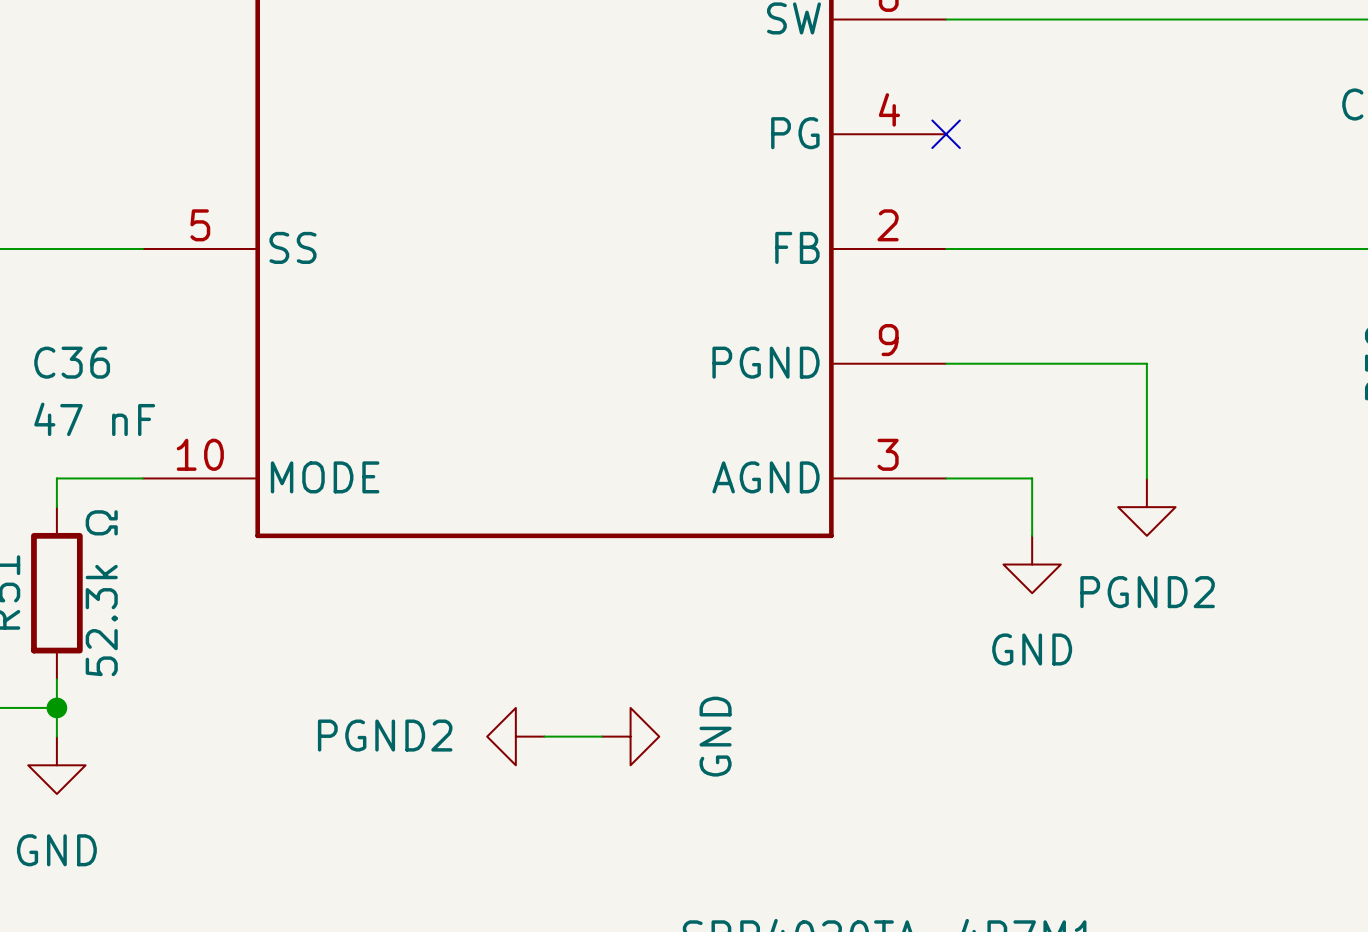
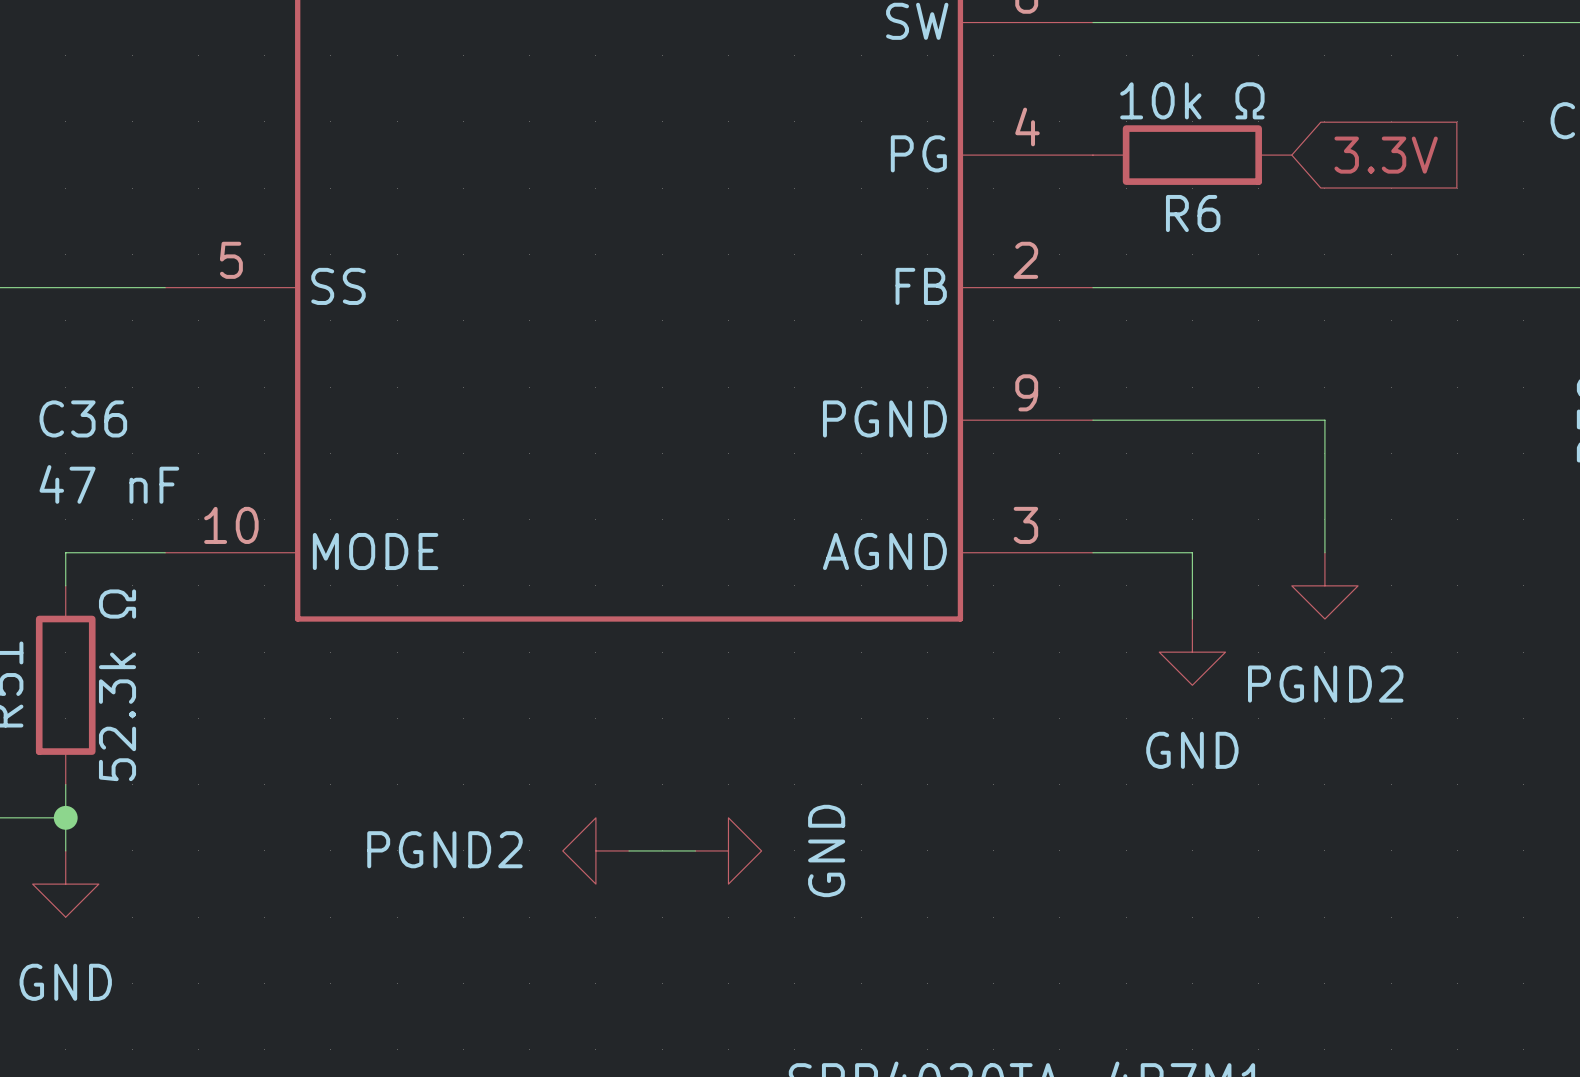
no-connect mark: (946, 134) -> none
R6: none -> 10k Ω (1192, 155)
global label: none -> 3.3V (1386, 155)

